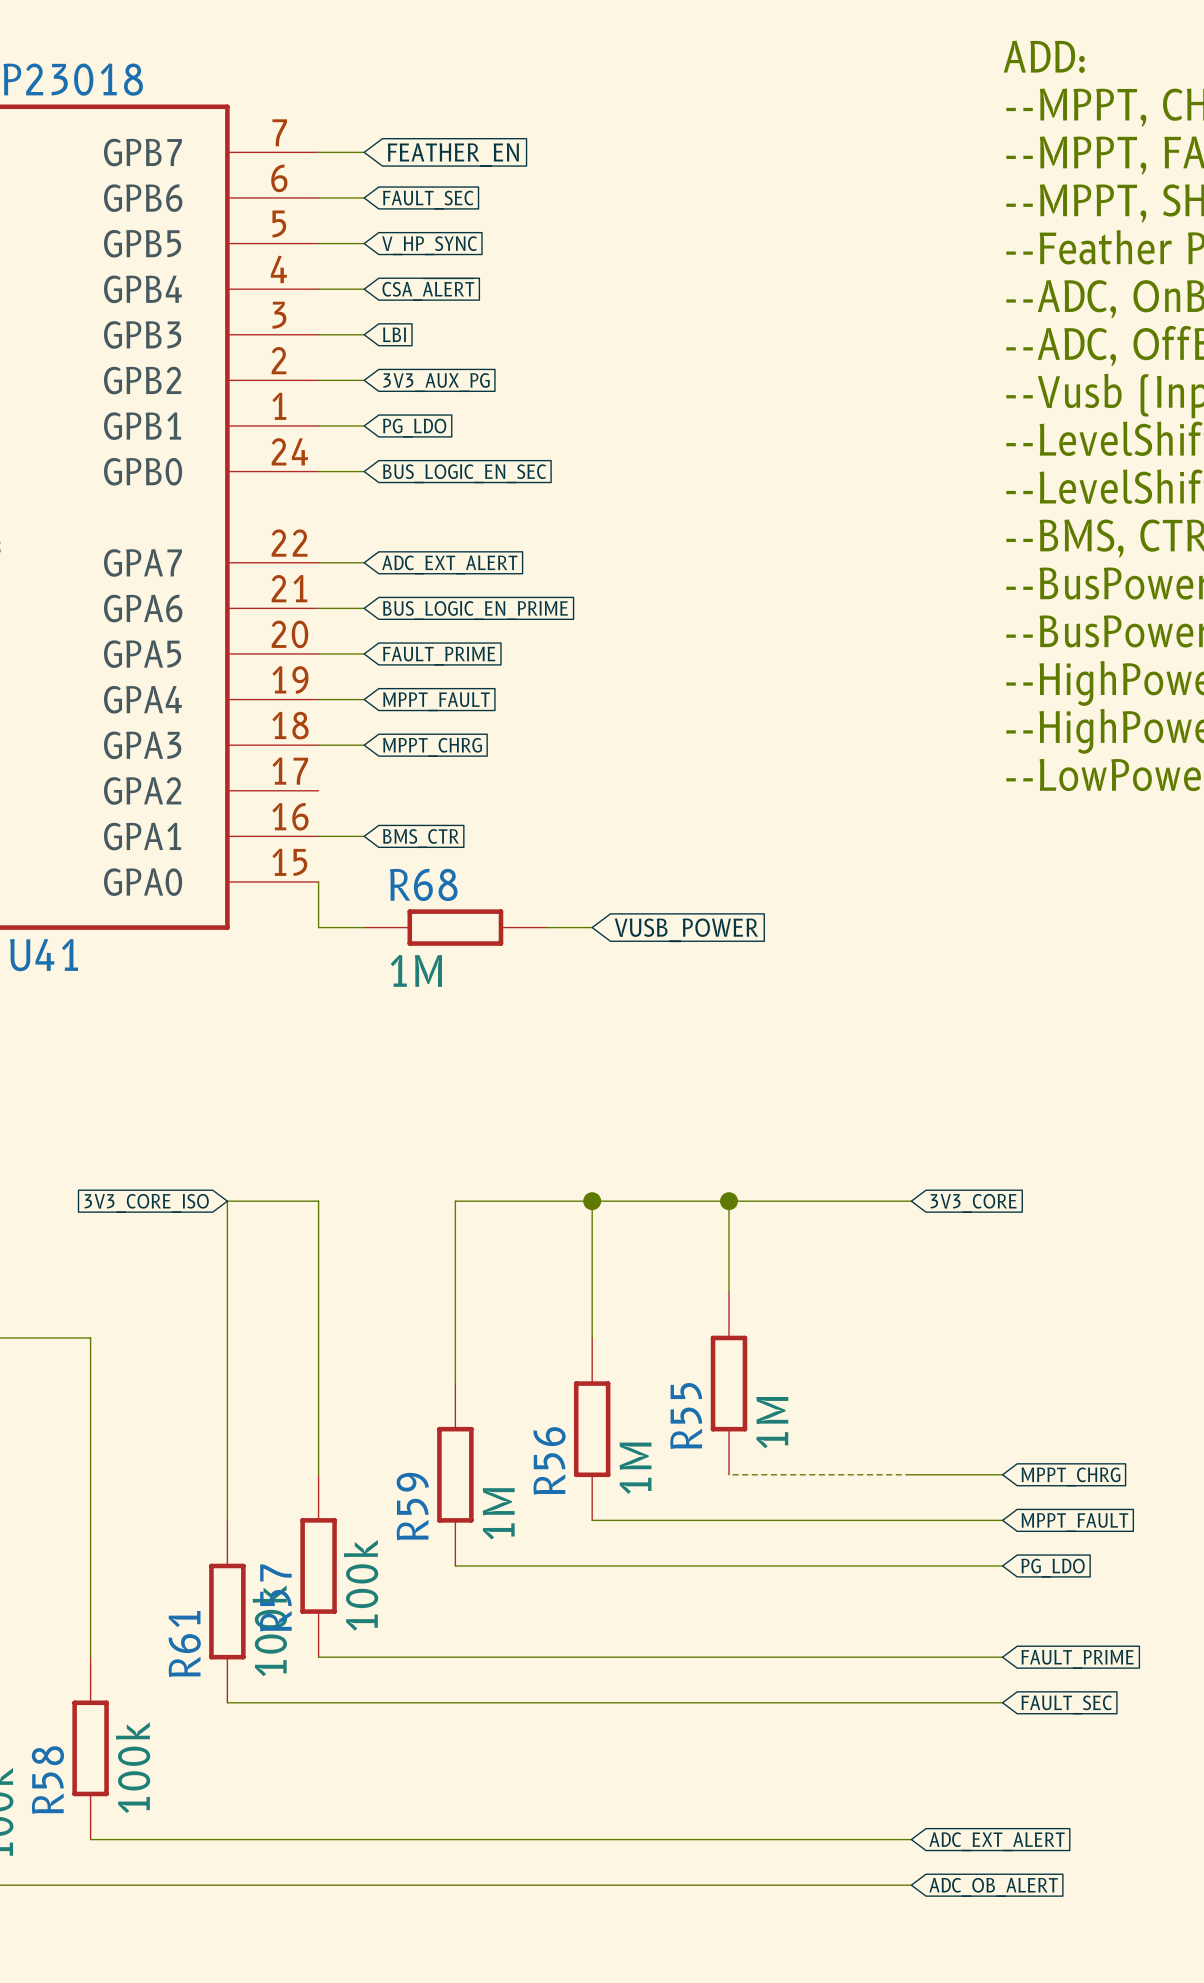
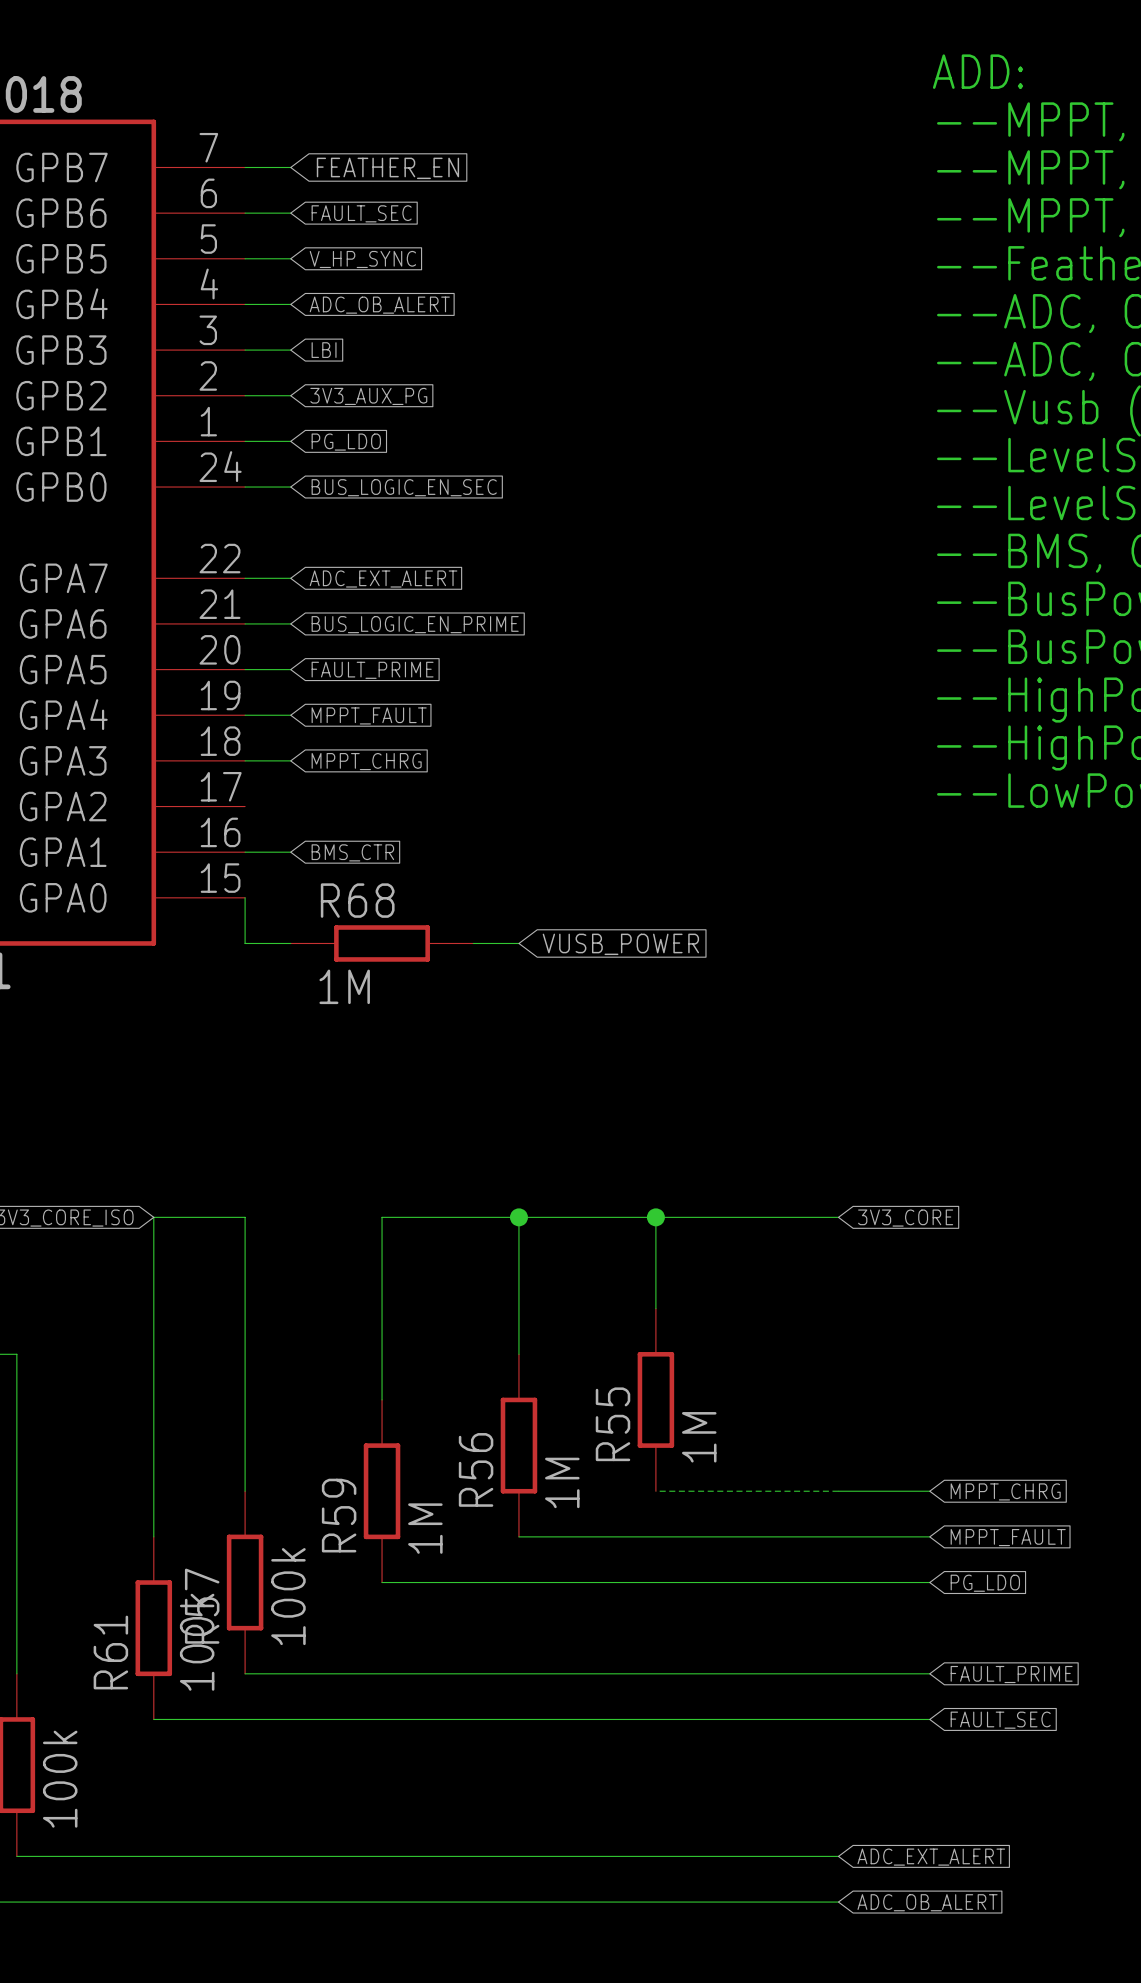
global label: CSA_~{ALERT} (428, 289) -> ADC_OB_ALERT (379, 305)

